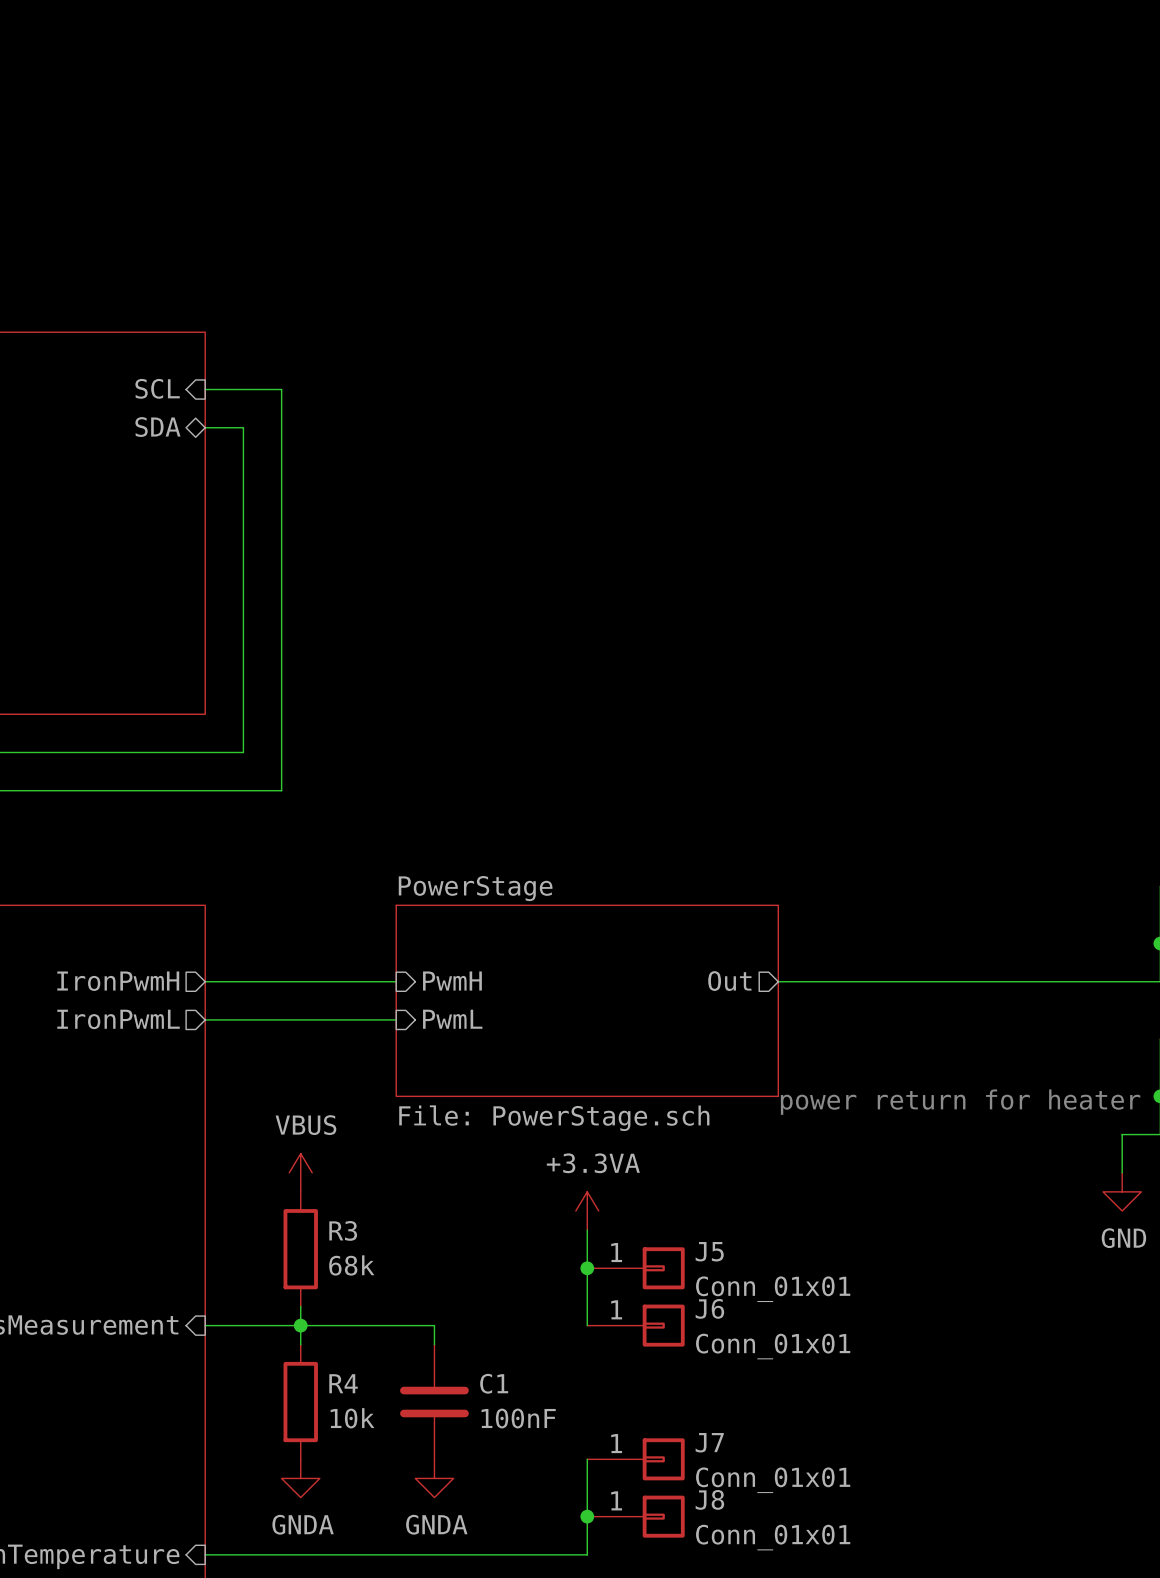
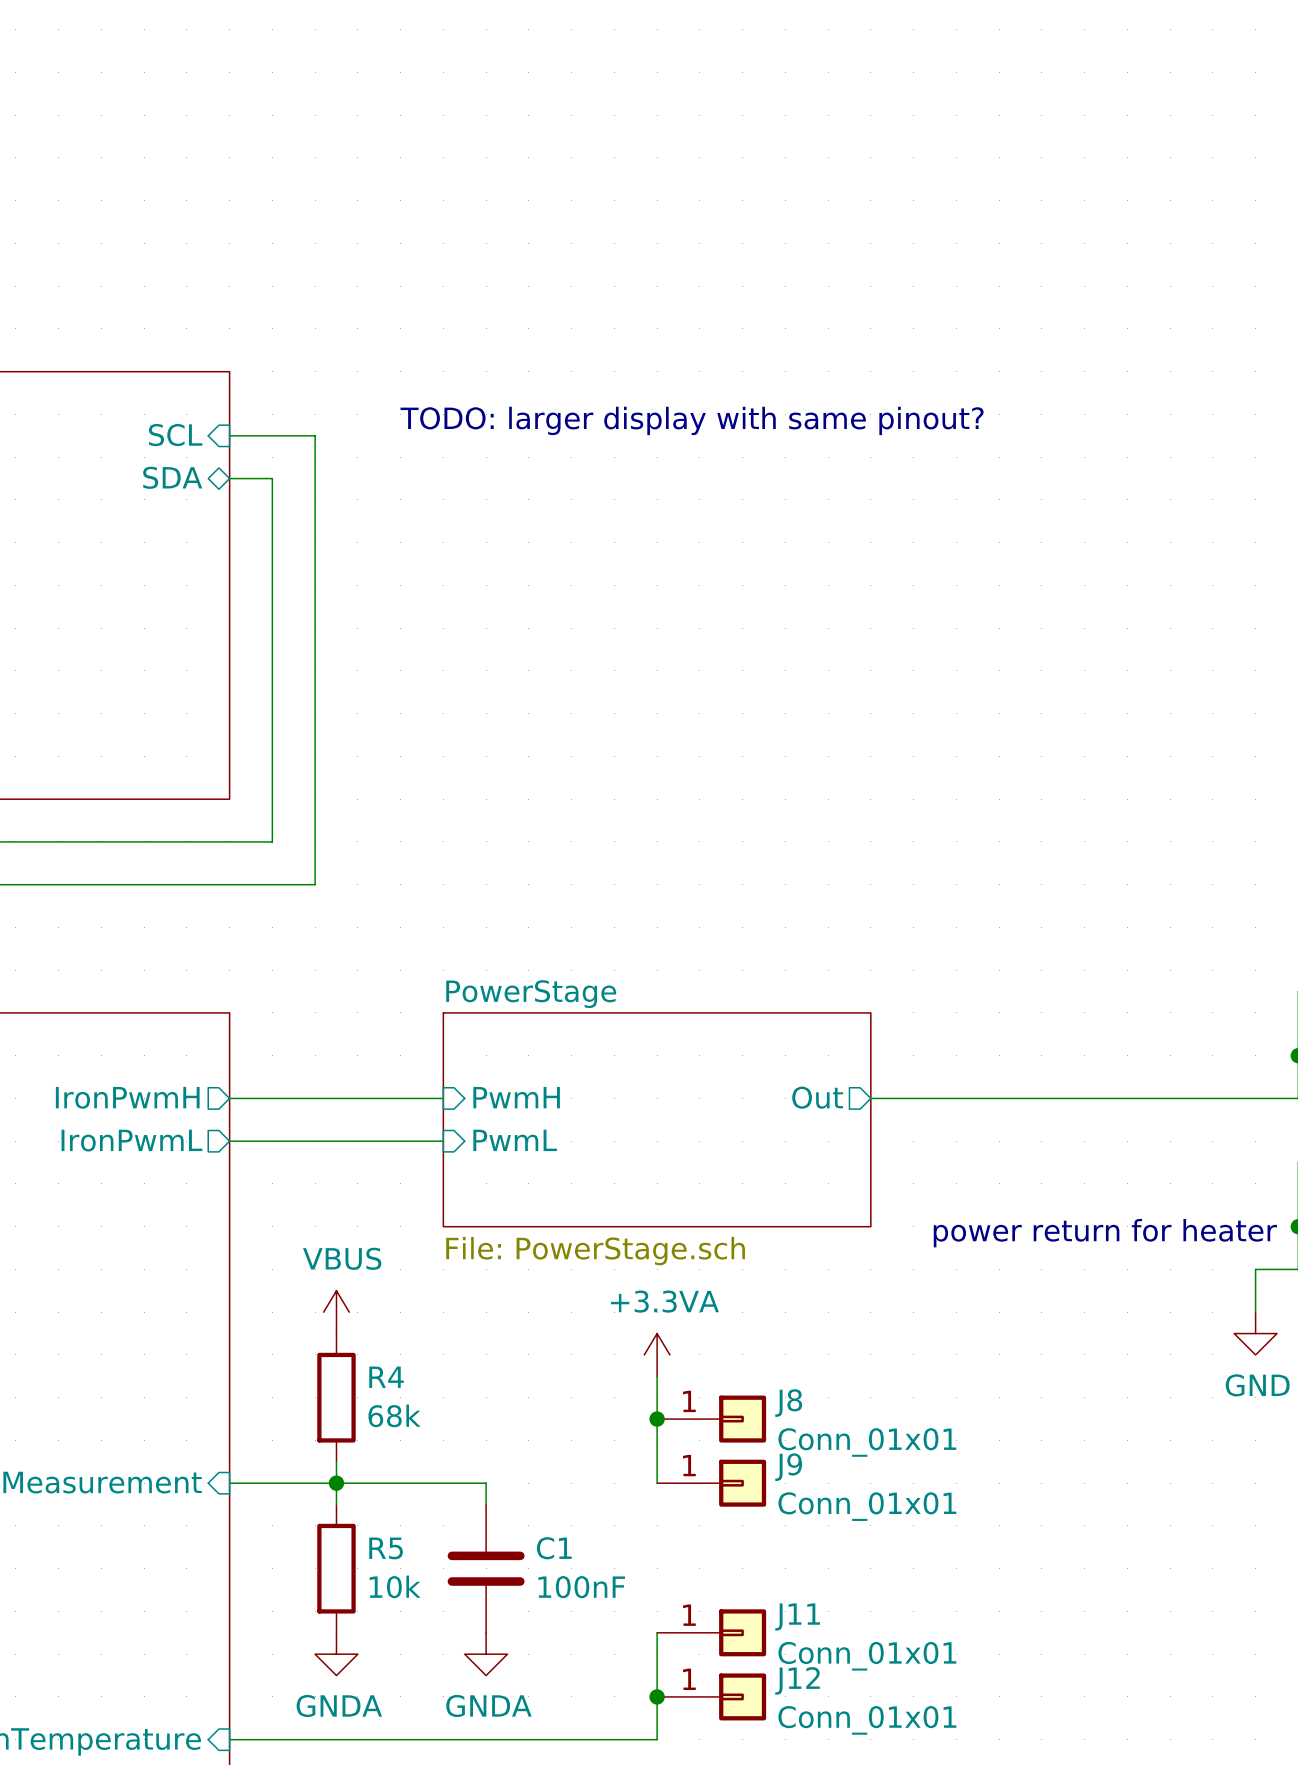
text: none -> TODO: larger display with same pinout? (692, 420)
R3 name: R3 (343, 1230) -> R4 (386, 1377)
J5 name: J5 (709, 1251) -> J8 (788, 1403)
J6 name: J6 (709, 1308) -> J9 (788, 1467)
R4 name: R4 (343, 1383) -> R5 (386, 1548)
J7 name: J7 (709, 1442) -> J11 (797, 1616)
J8 name: J8 (709, 1499) -> J12 (797, 1680)

